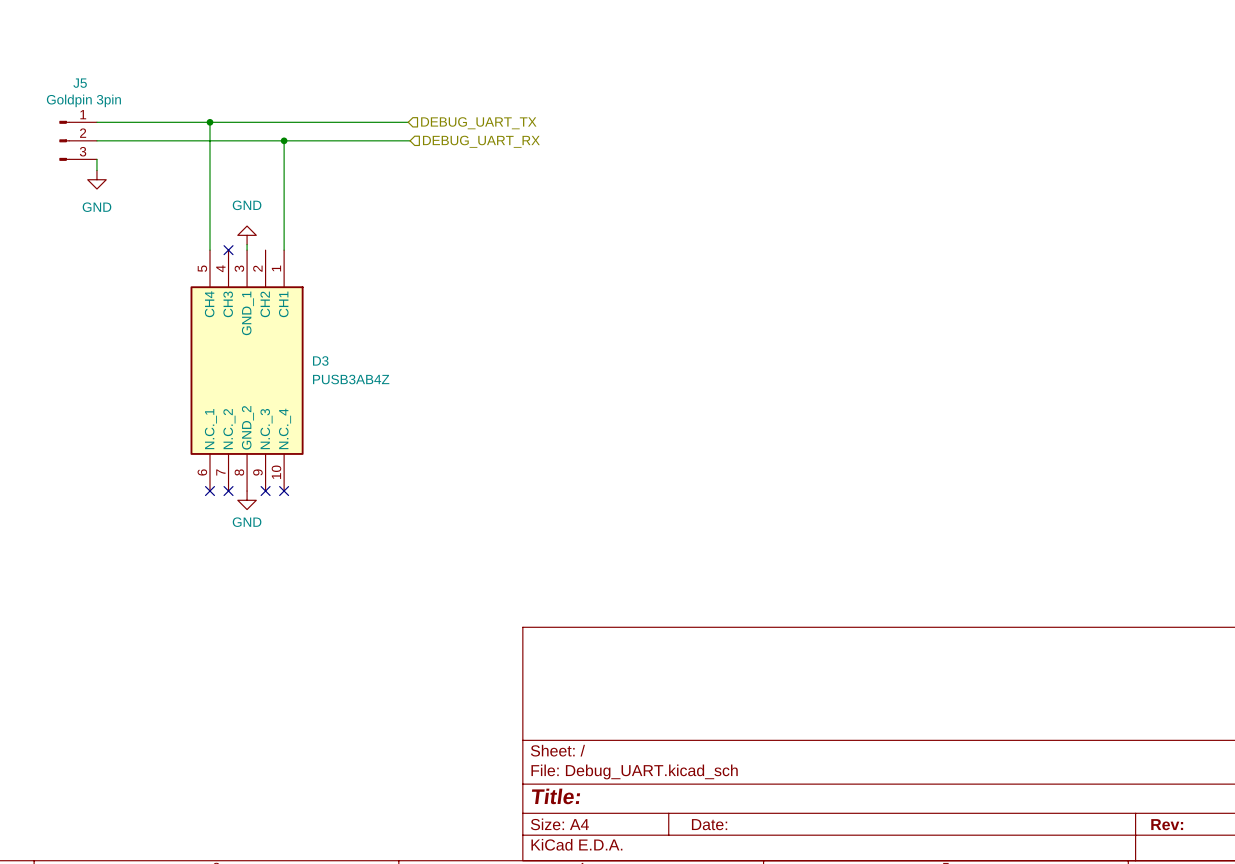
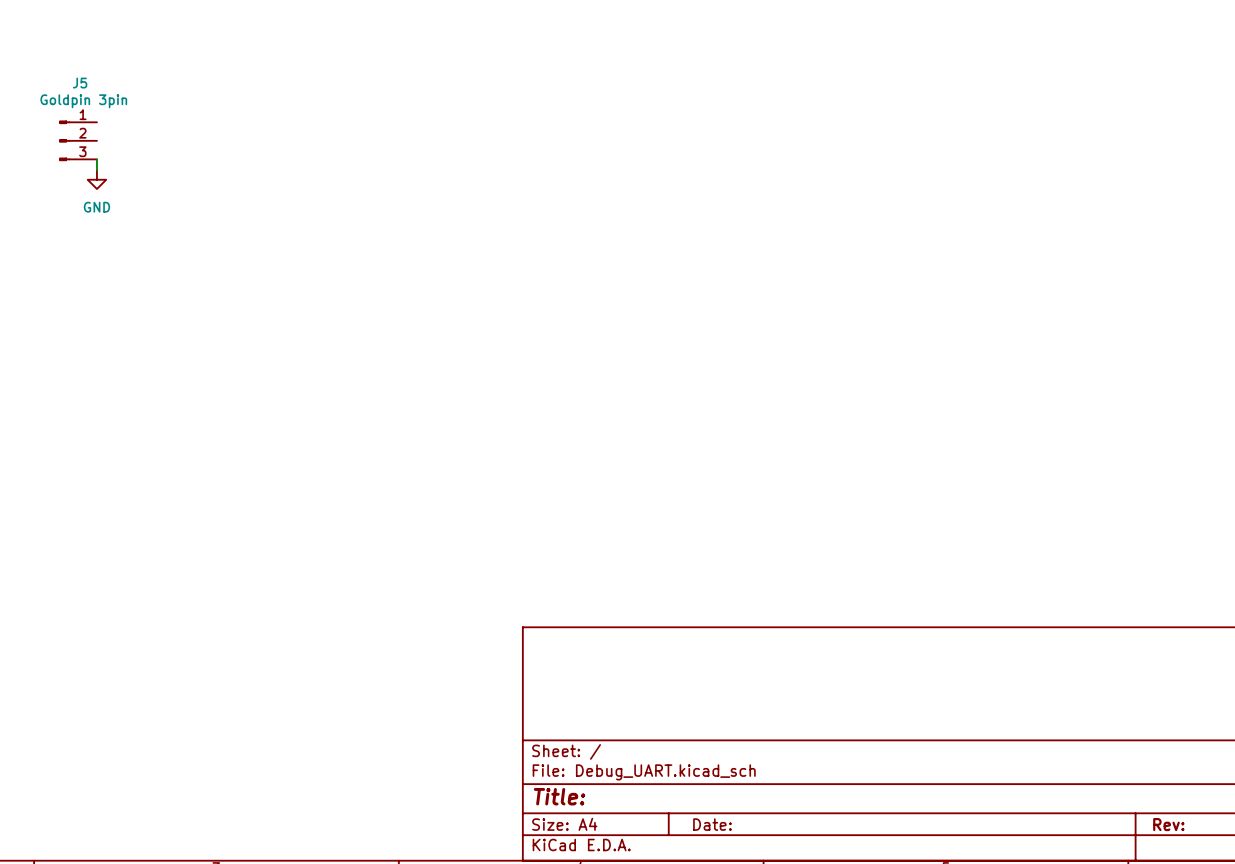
wire: (96, 122) (408, 122) -> none
wire: (209, 122) (209, 250) -> none
junction: (209, 122) -> none
hierarchical label: DEBUG_UART_TX (478, 123) -> none
wire: (96, 140) (410, 140) -> none
wire: (284, 140) (284, 250) -> none
junction: (284, 140) -> none
hierarchical label: DEBUG_UART_RX (481, 141) -> none
power symbol: GND (247, 235) -> none
wire: (247, 244) (247, 250) -> none
no-connect mark: (228, 250) -> none
D3: PUSB3AB4Z (247, 370) -> none
no-connect mark: (209, 491) -> none
no-connect mark: (228, 491) -> none
no-connect mark: (265, 491) -> none
no-connect mark: (284, 491) -> none
power symbol: GND (247, 500) -> none

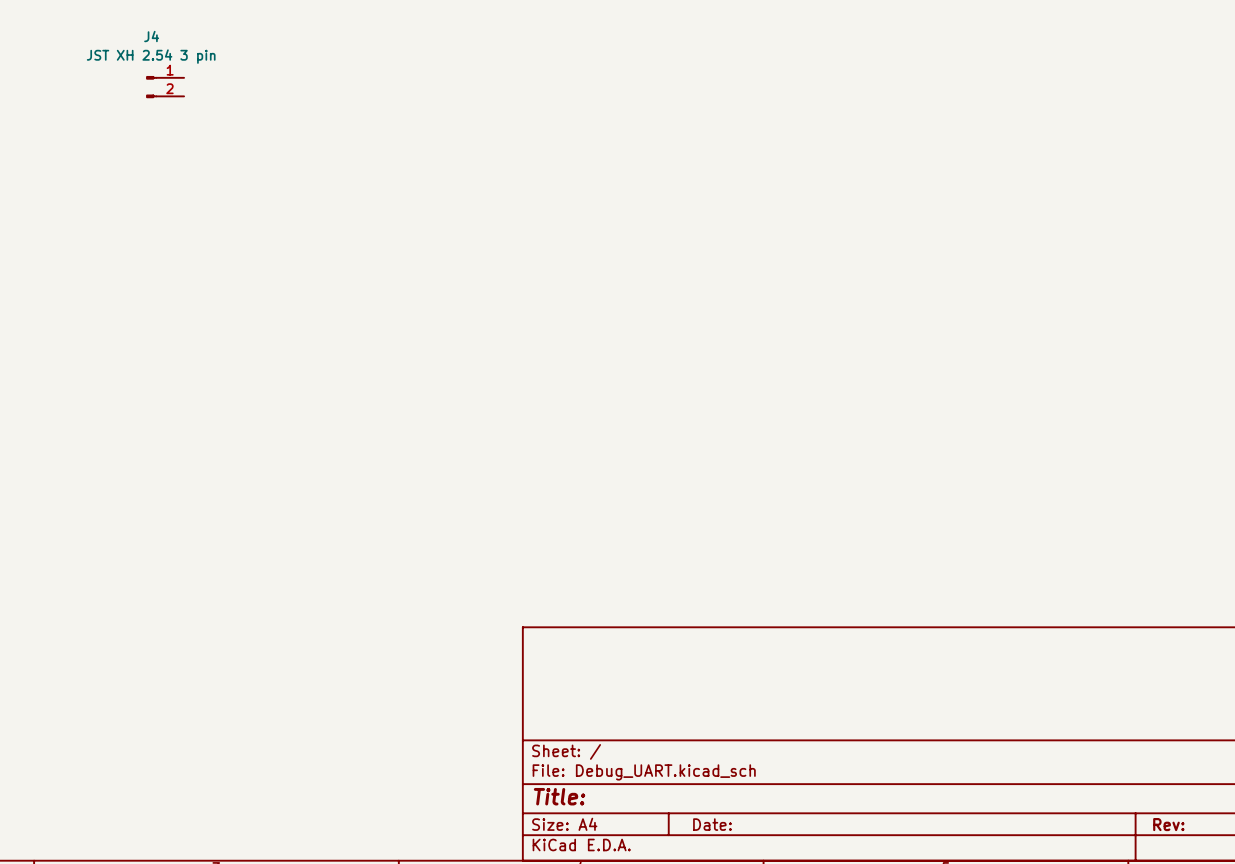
J4: none -> JST XH 2.54 3 pin (165, 87)
J5: Goldpin 3pin (78, 140) -> none
wire: (96, 159) (96, 170) -> none
power symbol: GND (96, 179) -> none

